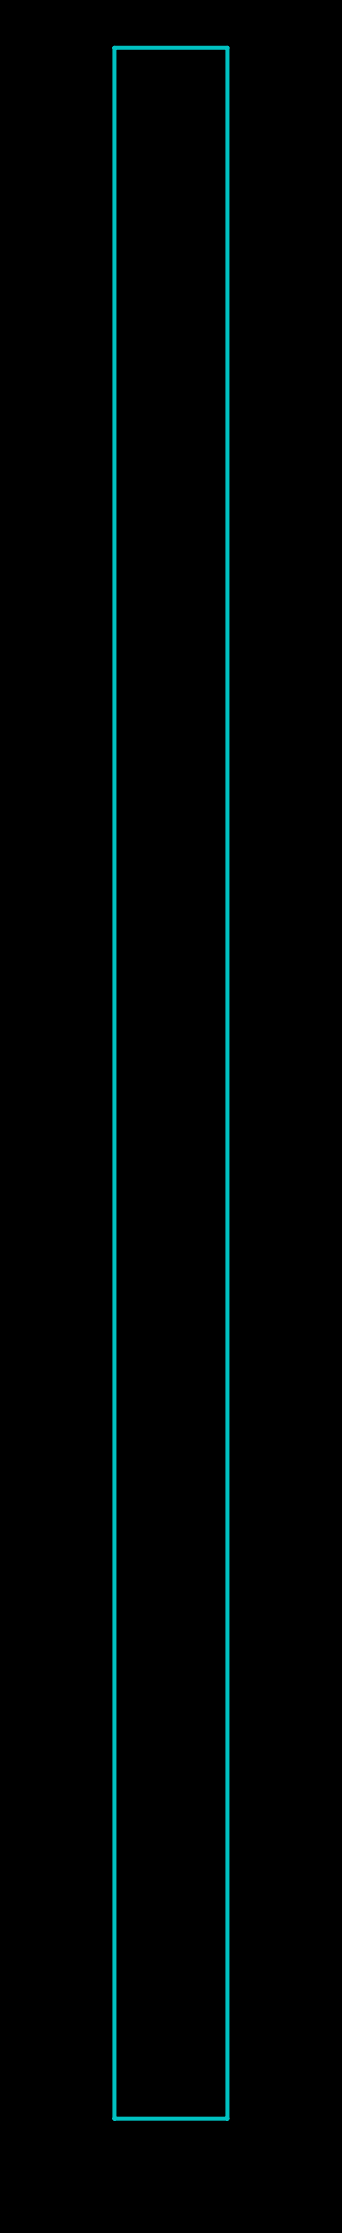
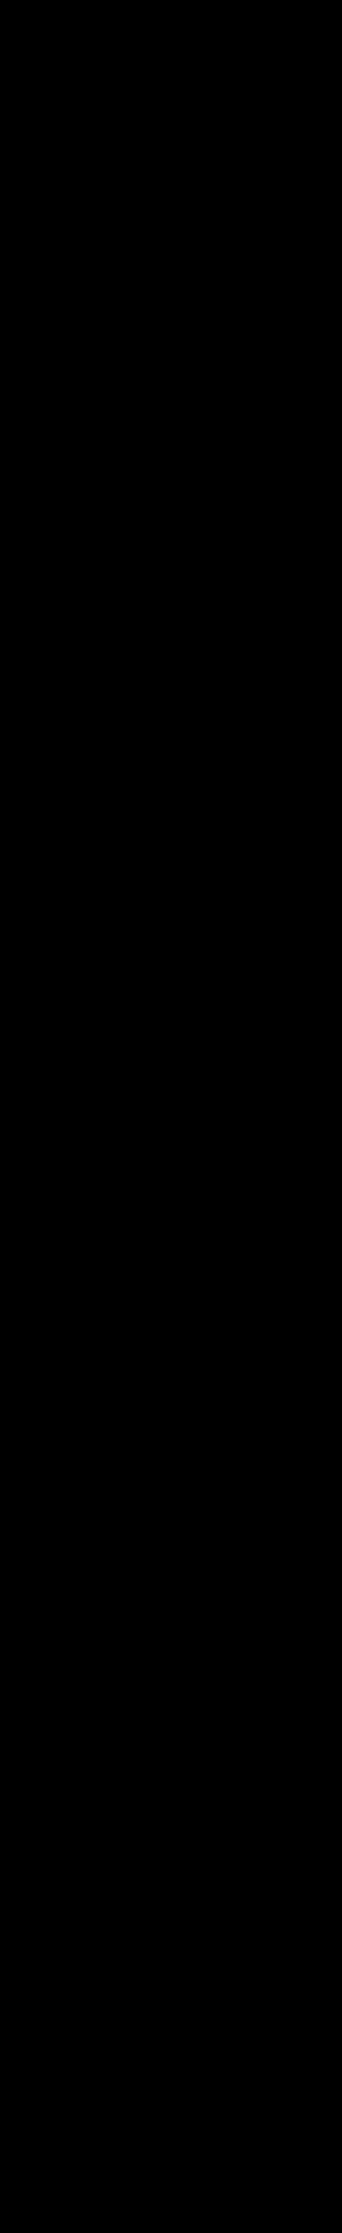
line: (114, 47) (227, 47) (227, 2118) (114, 2118) (114, 47) -> none

